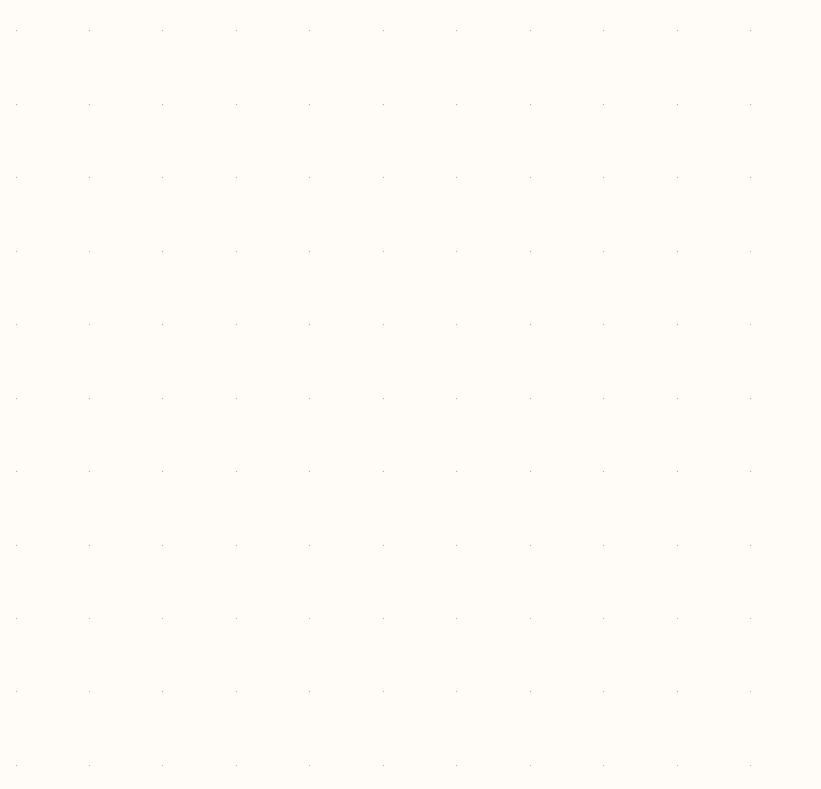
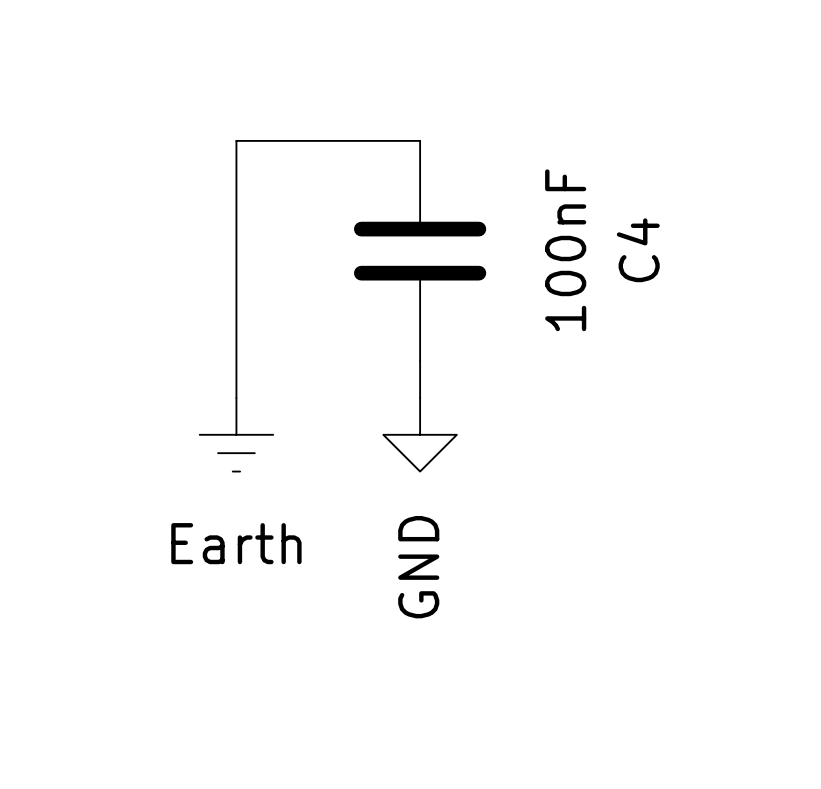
wire: none -> (420, 140) (236, 140) (236, 398)
C4: none -> 100nF (420, 251)
wire: none -> (420, 361) (420, 398)
power symbol: none -> Earth (236, 434)
power symbol: none -> GND (420, 434)

